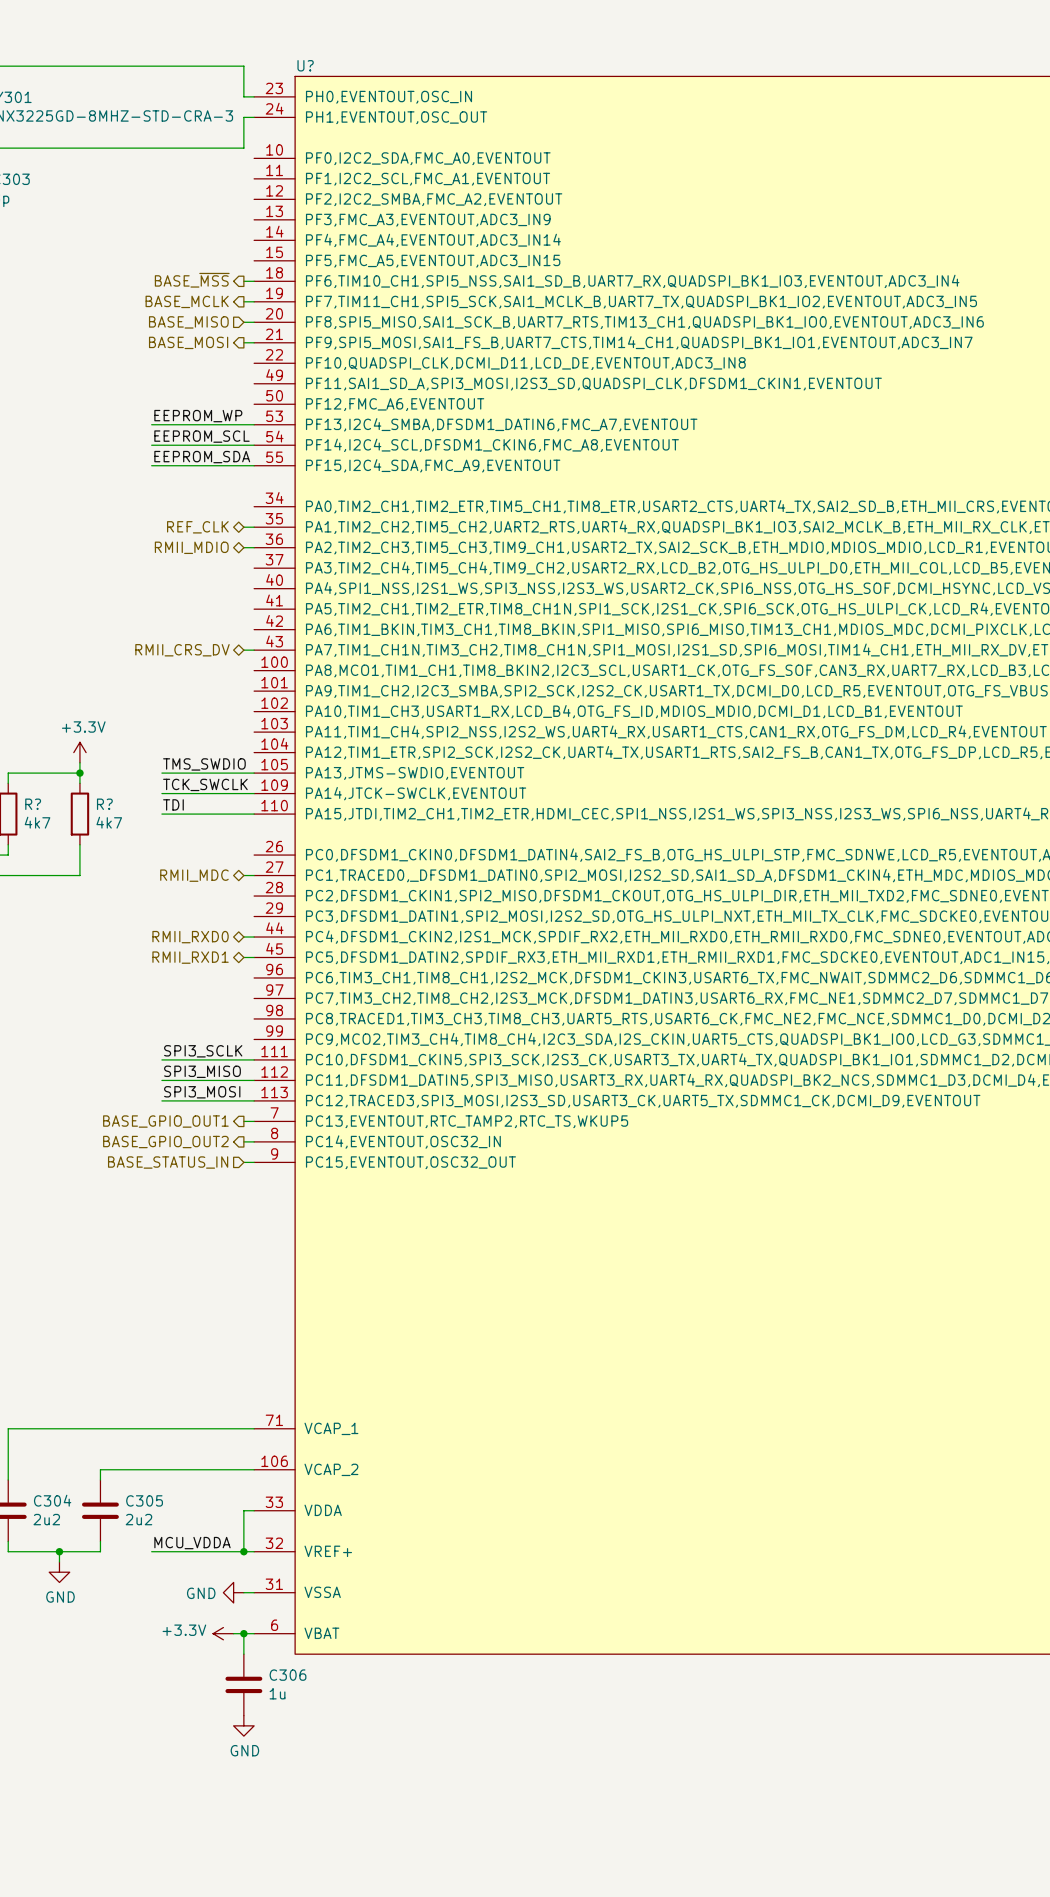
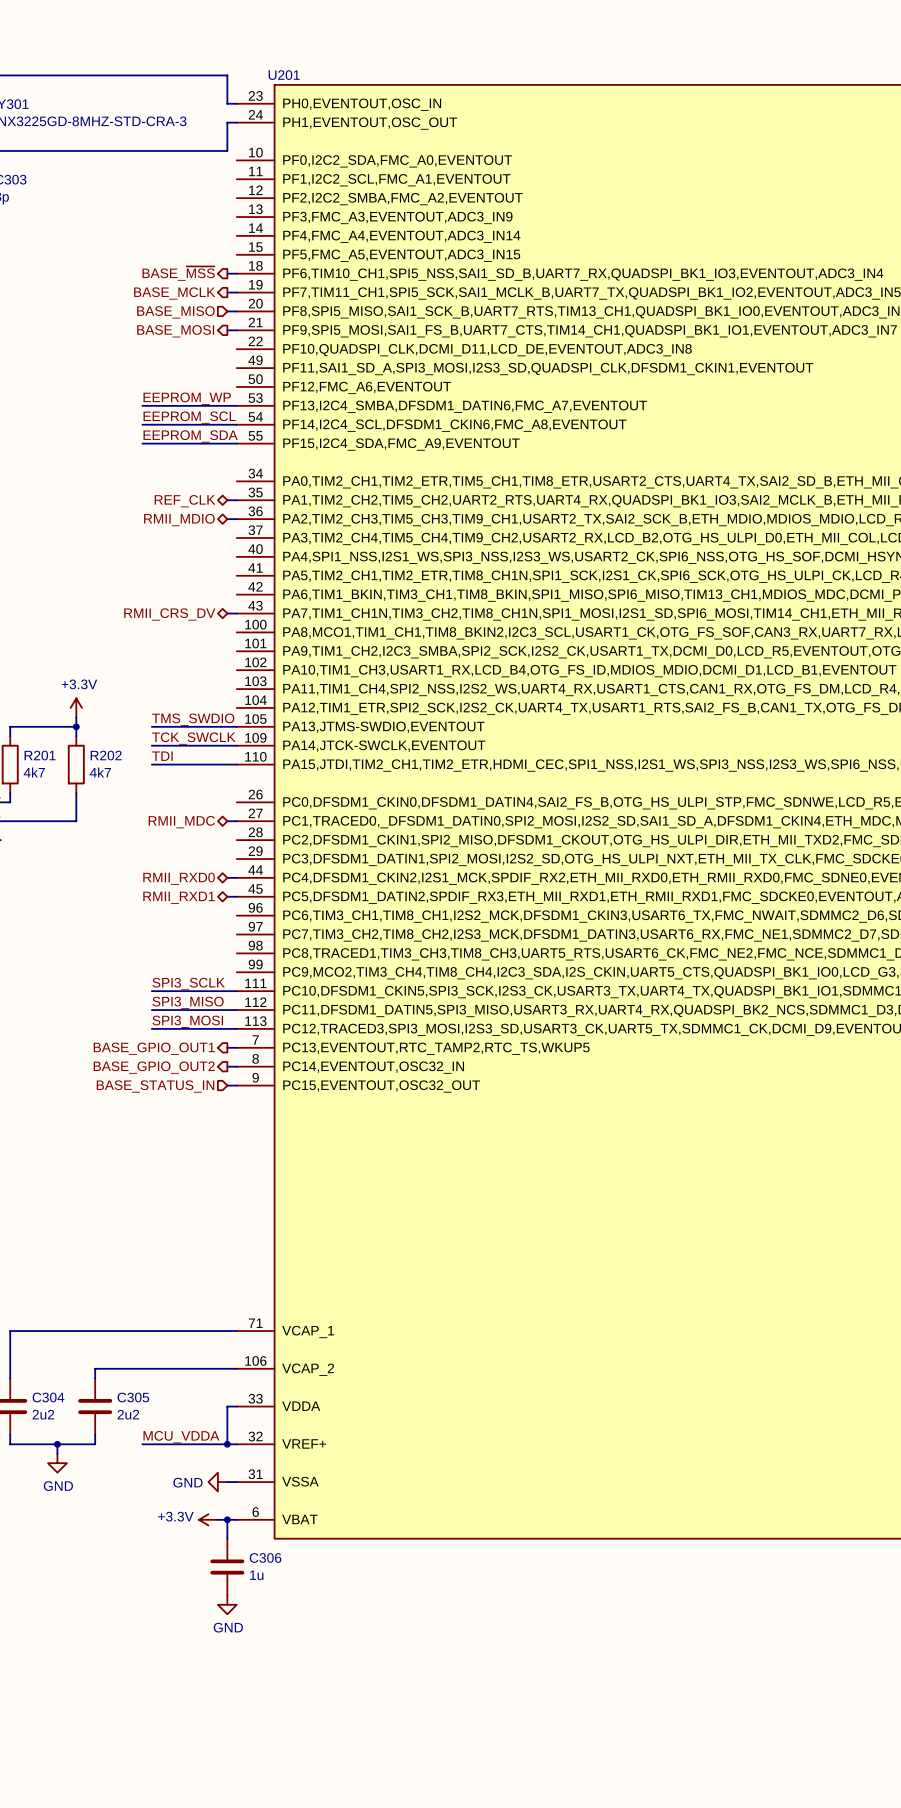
U? name: U? (305, 65) -> U201 (284, 75)
R? name: R? (33, 804) -> R201 (40, 755)
R? name: R? (104, 804) -> R202 (106, 755)

